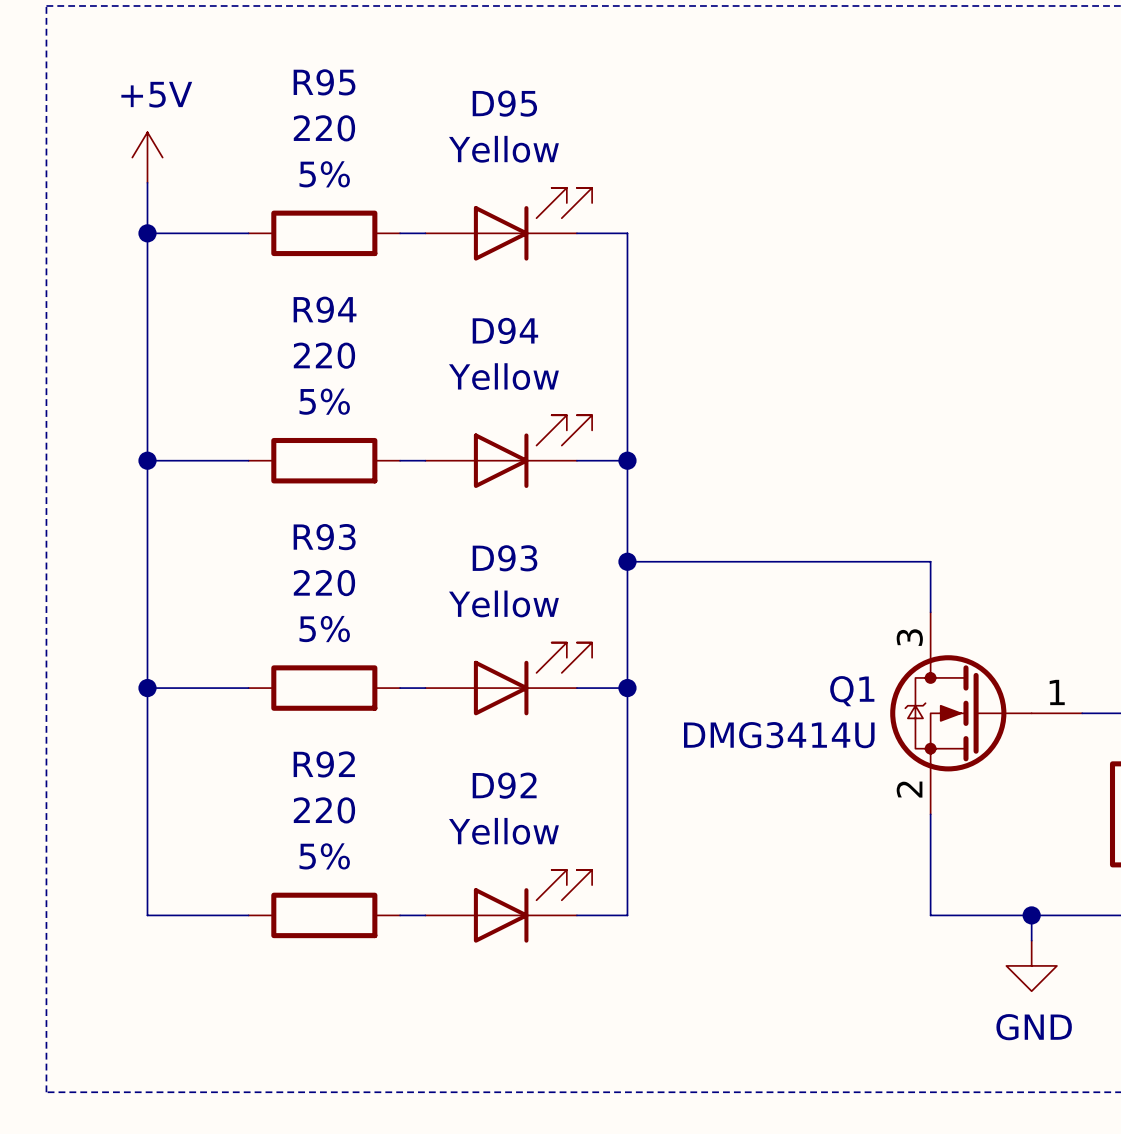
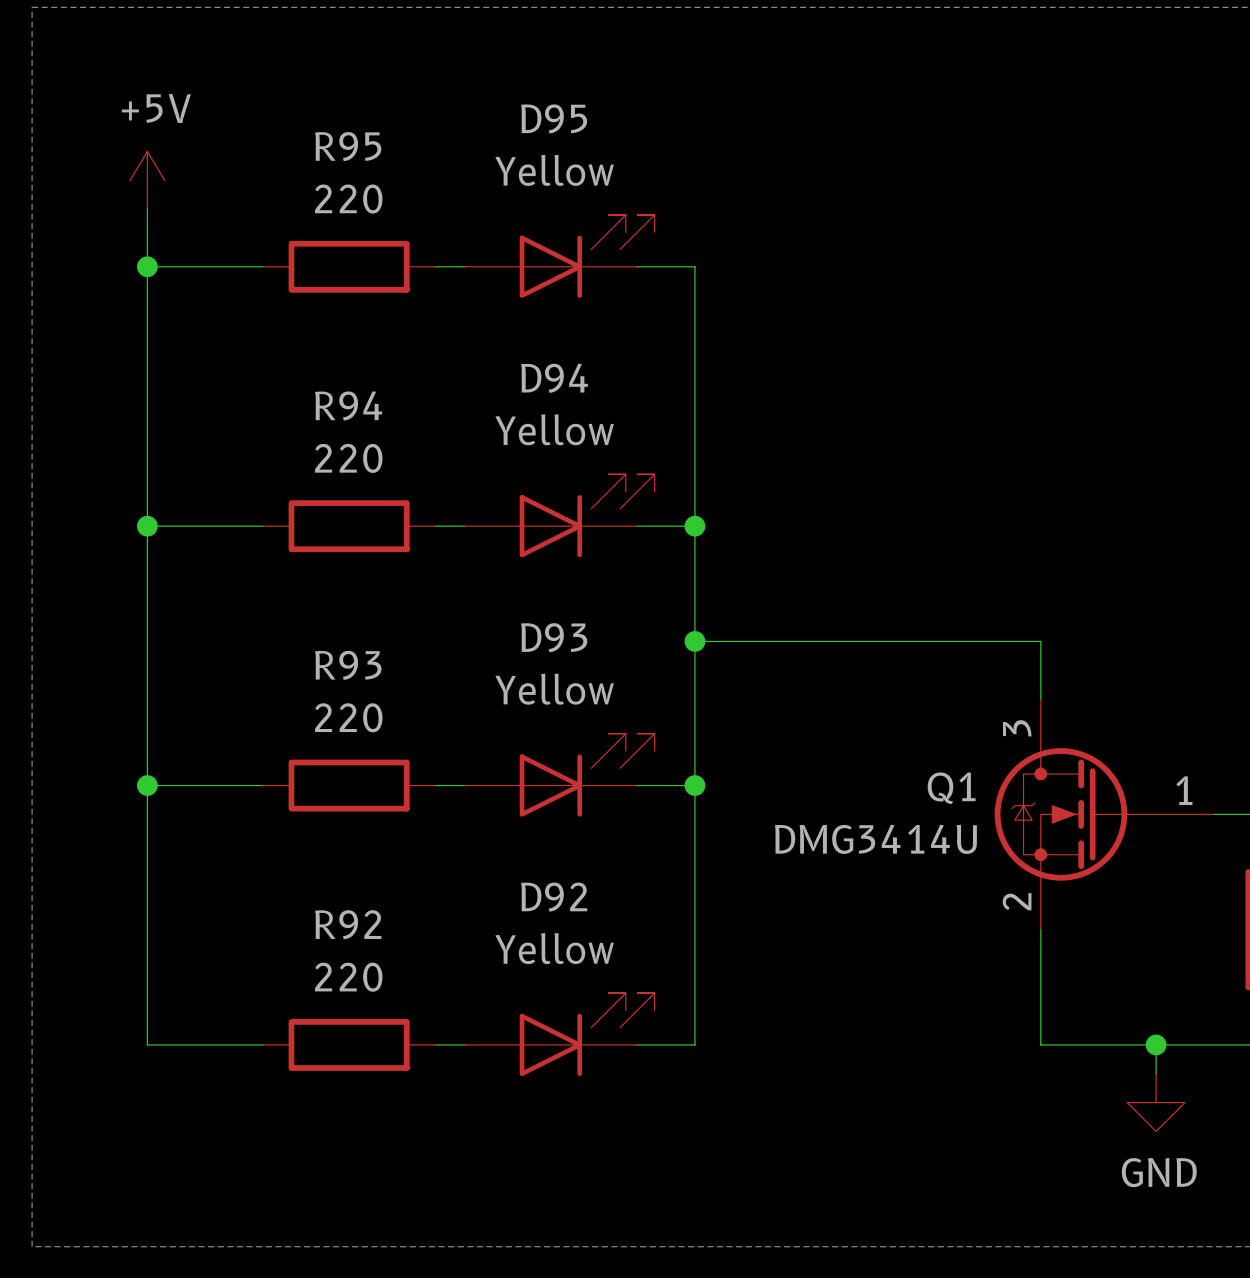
R95 name position: R95 (324, 82) -> R95 (348, 146)
R95 value position: 220 (324, 128) -> 220 (348, 199)
R95 text: 5% (324, 174) -> none
R94 name position: R94 (325, 309) -> R94 (348, 405)
R94 value position: 220 (324, 355) -> 220 (348, 458)
R94 text: 5% (324, 401) -> none
R93 name position: R93 (324, 537) -> R93 (348, 665)
R93 value position: 220 (324, 583) -> 220 (348, 717)
R93 text: 5% (324, 629) -> none
R92 name position: R92 (324, 764) -> R92 (348, 924)
R92 value position: 220 (324, 810) -> 220 (348, 977)
R92 text: 5% (324, 856) -> none

